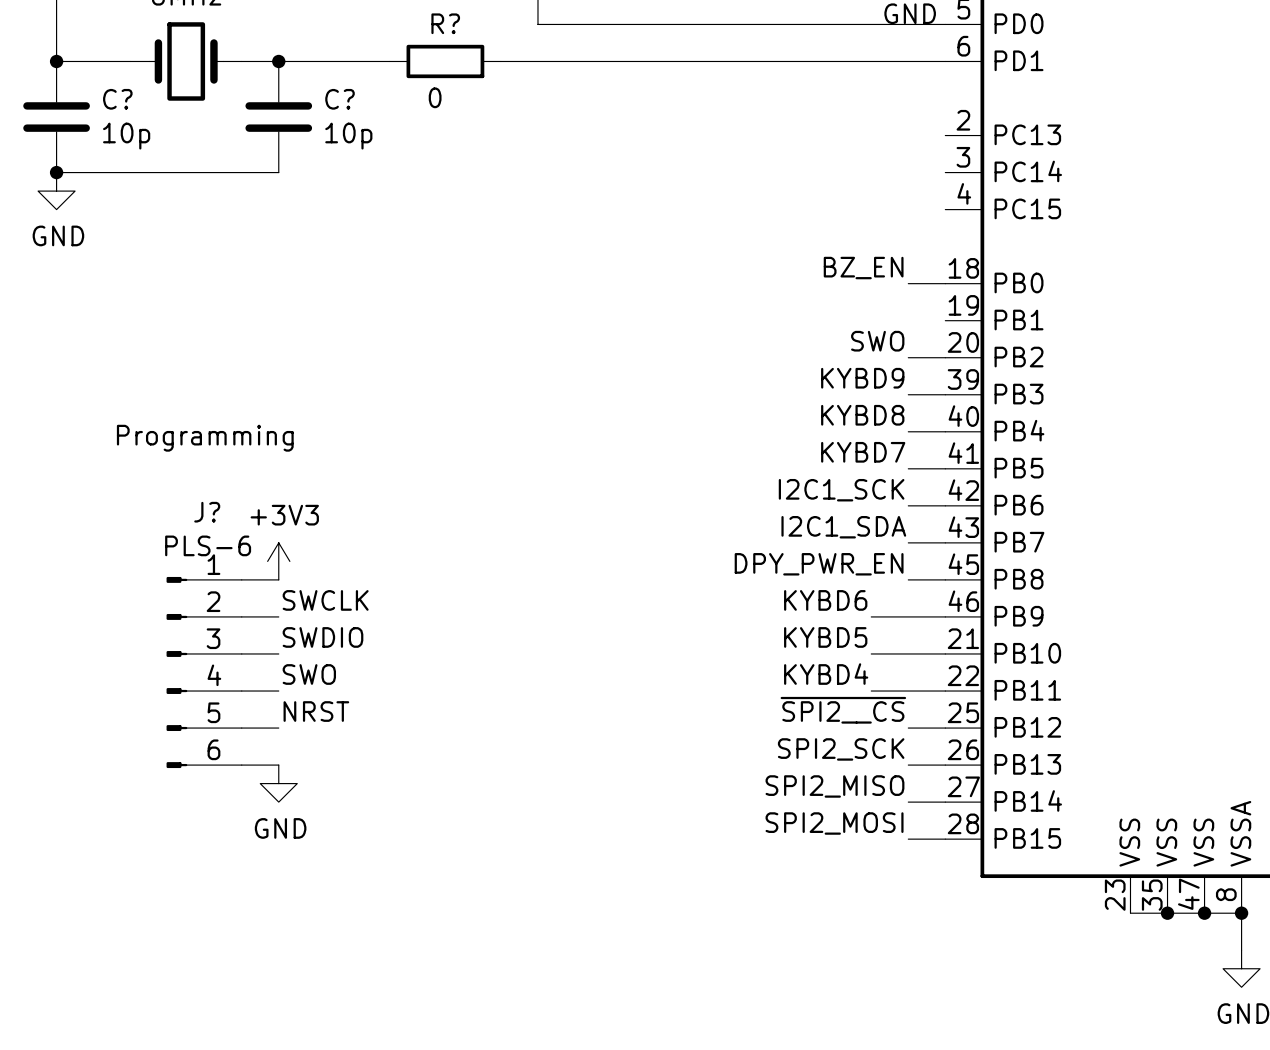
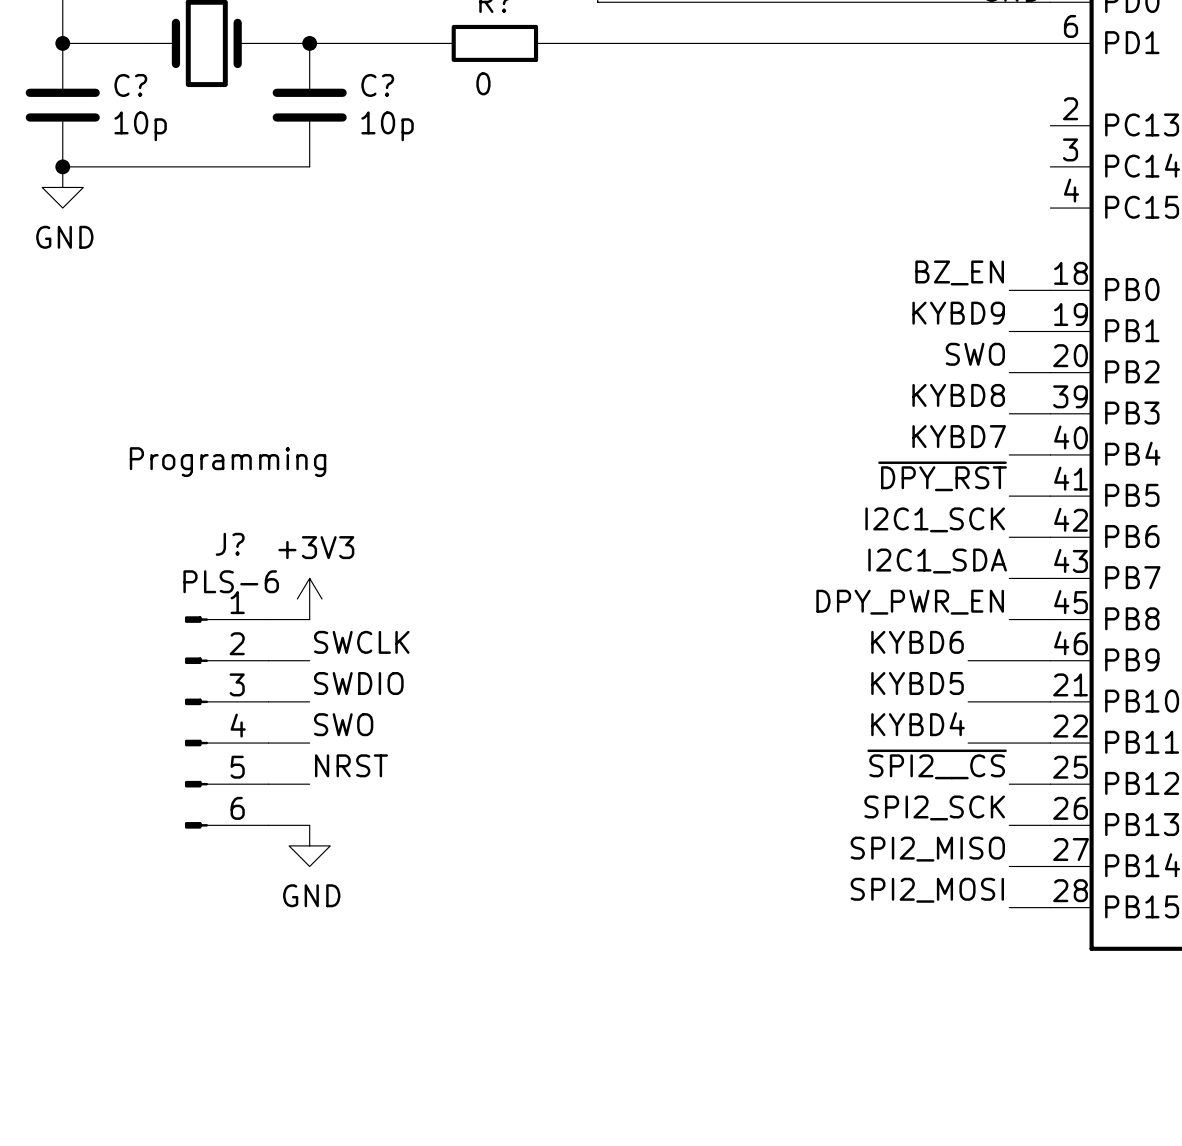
label: none -> KYBD9 (958, 313)
wire: none -> (1009, 331) (1050, 331)
label: KYBD9 (862, 378) -> KYBD8 (958, 395)
label: KYBD8 (862, 415) -> KYBD7 (959, 436)
label: KYBD7 (863, 452) -> ~{DPY_RST} (942, 476)

